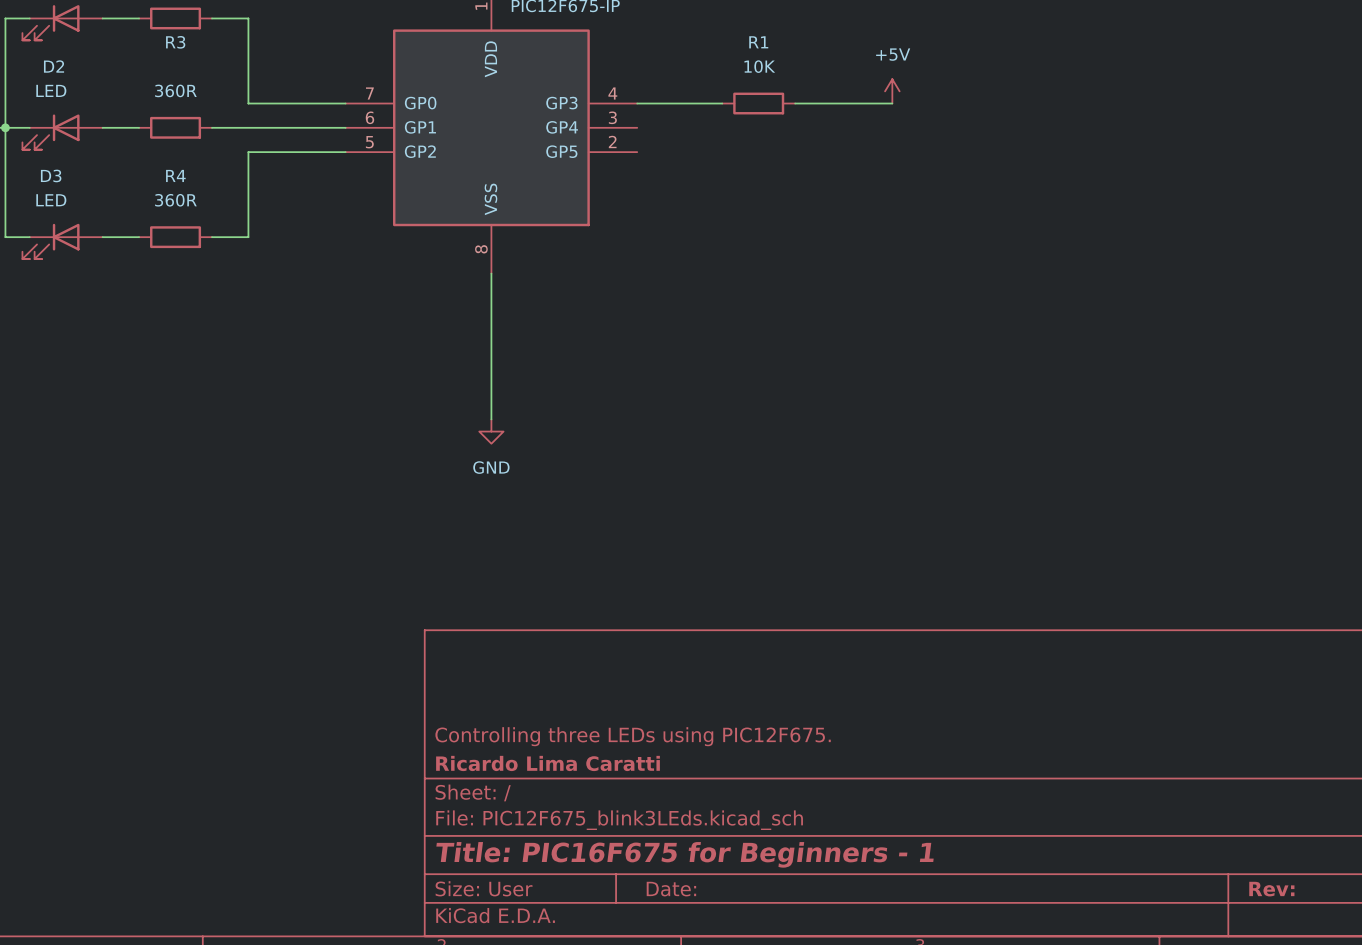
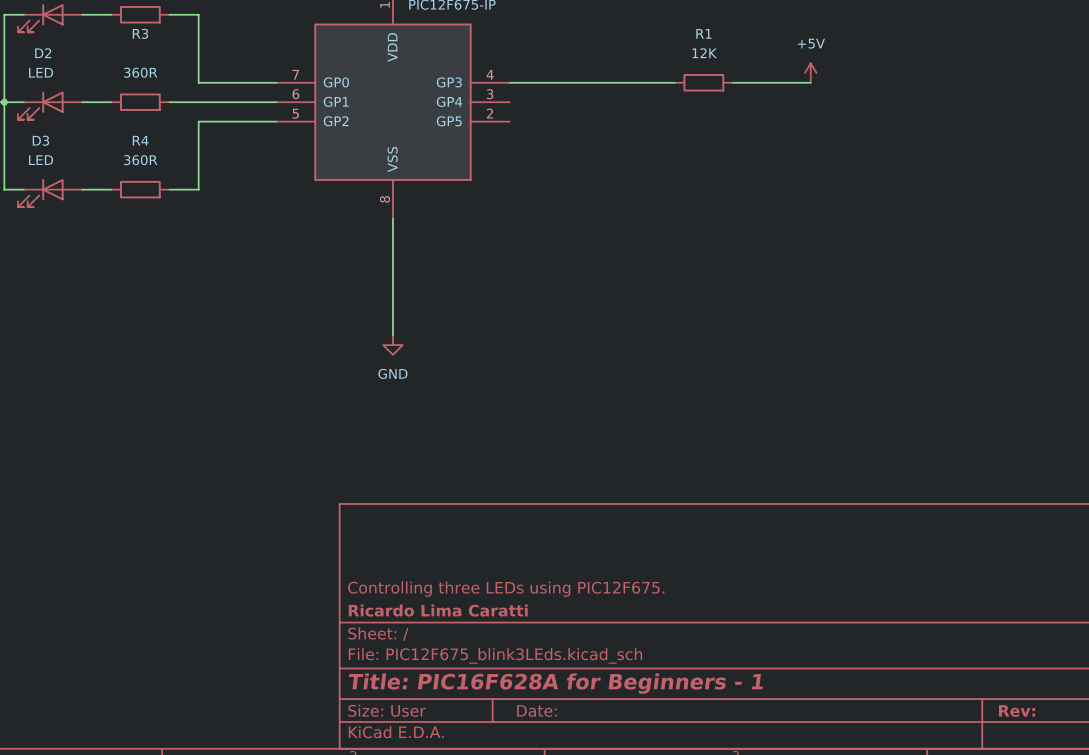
R1 value: 10K (759, 66) -> 12K (704, 53)
power symbol position: +5V (892, 91) -> +5V (810, 73)
wire: none -> (577, 82) (635, 82)
R1 position: (758, 103) -> (703, 82)
wire: (843, 103) (892, 103) -> none
wire: none -> (733, 82) (810, 82)
title block: Title: PIC16F675 for Beginners - 1 (685, 854) -> Title: PIC16F628A for Beginners - 1 (555, 683)

